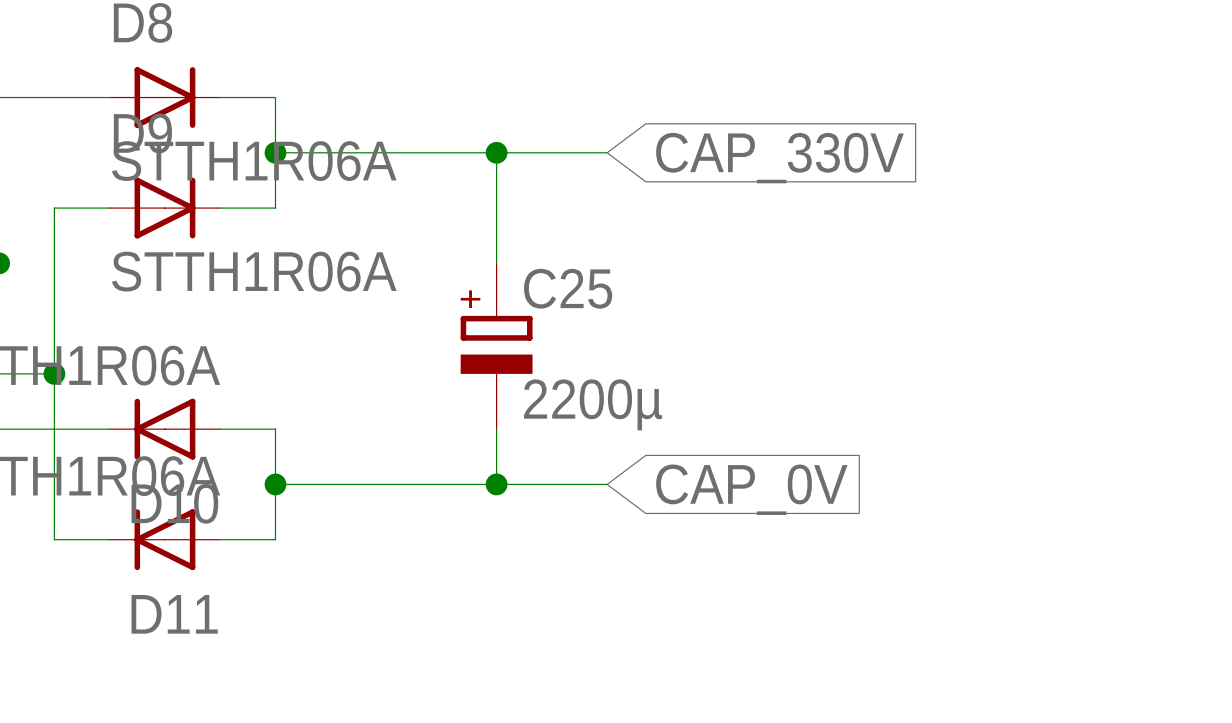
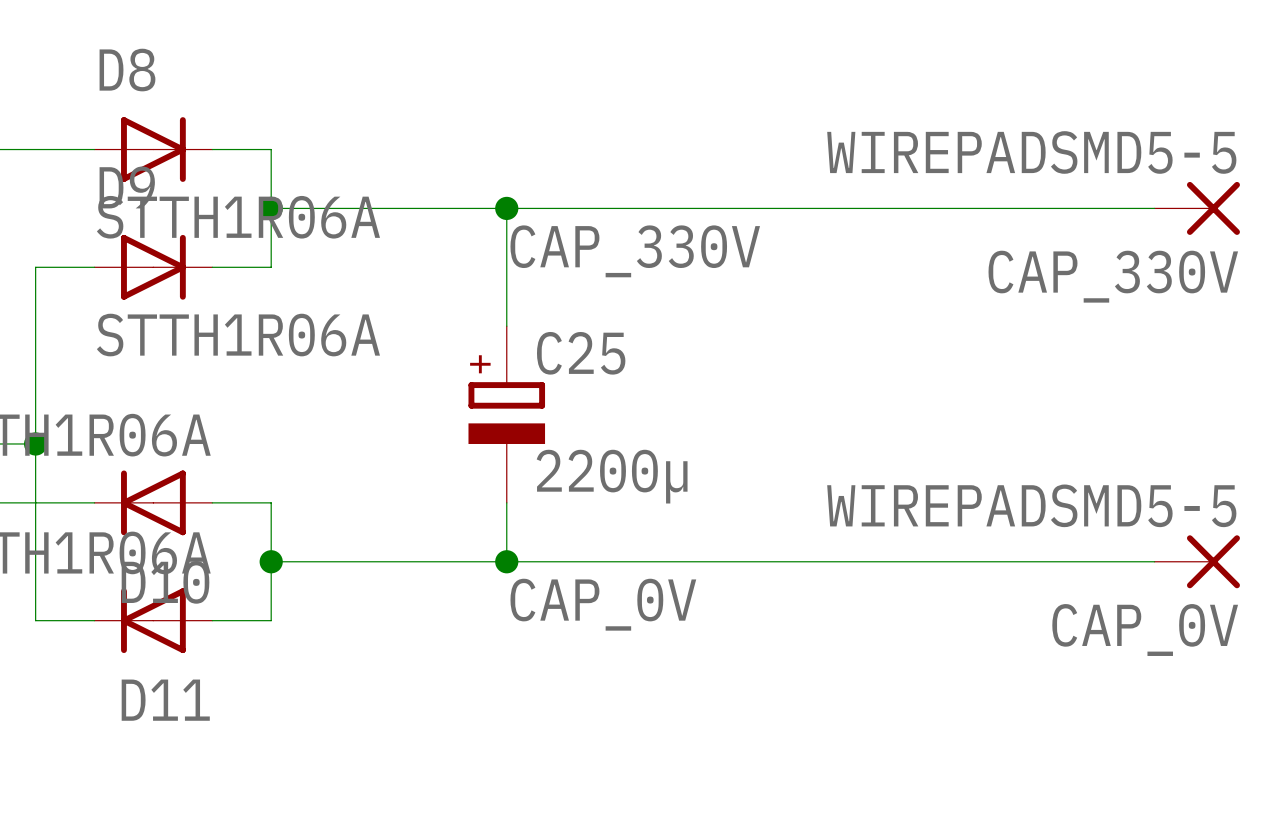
wire: none -> (624, 208) (1154, 208)
CAP_330V: none -> WIREPADSMD5-5 (1197, 208)
global label: CAP_330V (779, 158) -> none
label: none -> CAP_330V (635, 251)
wire: none -> (624, 561) (1154, 561)
CAP_0V: none -> WIREPADSMD5-5 (1197, 561)
global label: CAP_0V (751, 489) -> none
label: none -> CAP_0V (603, 604)

